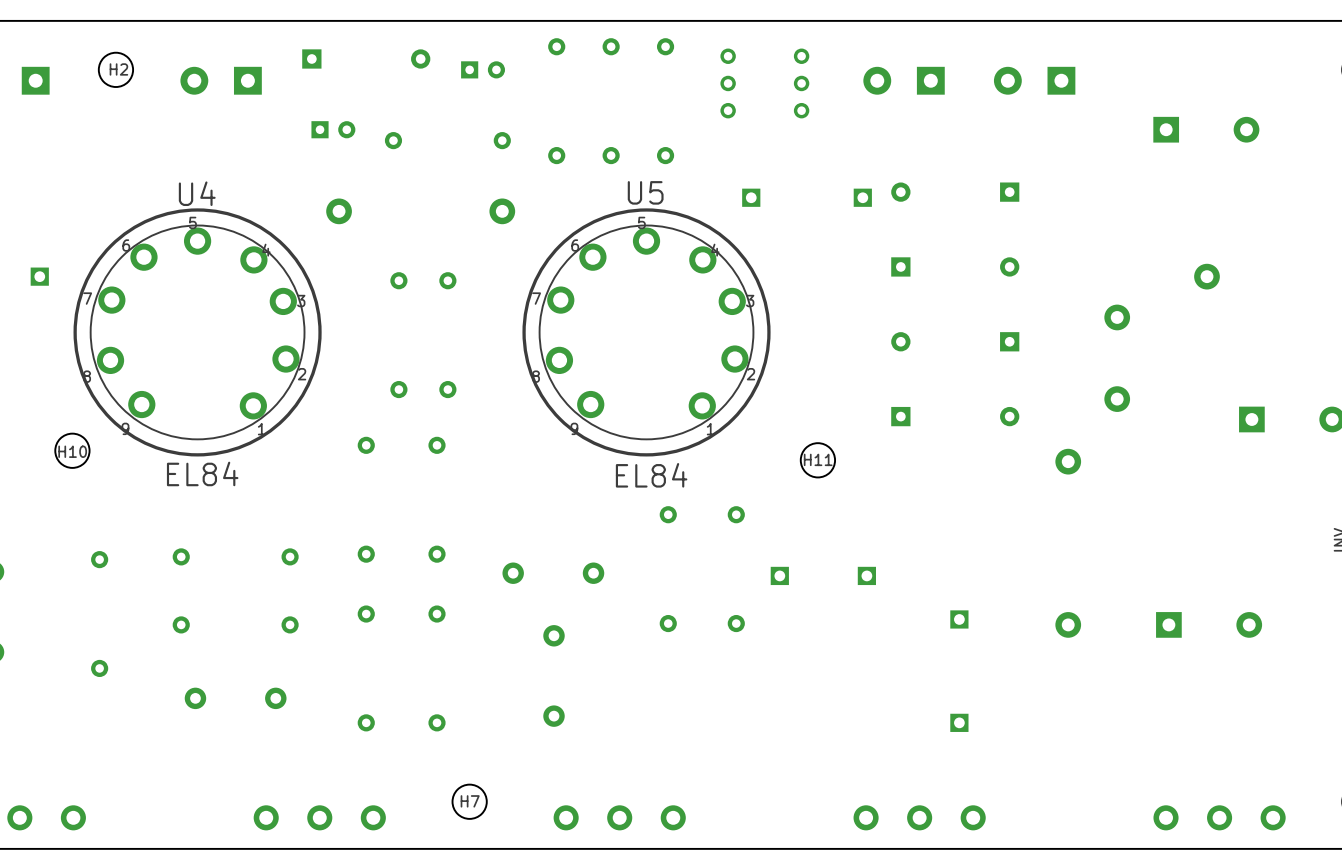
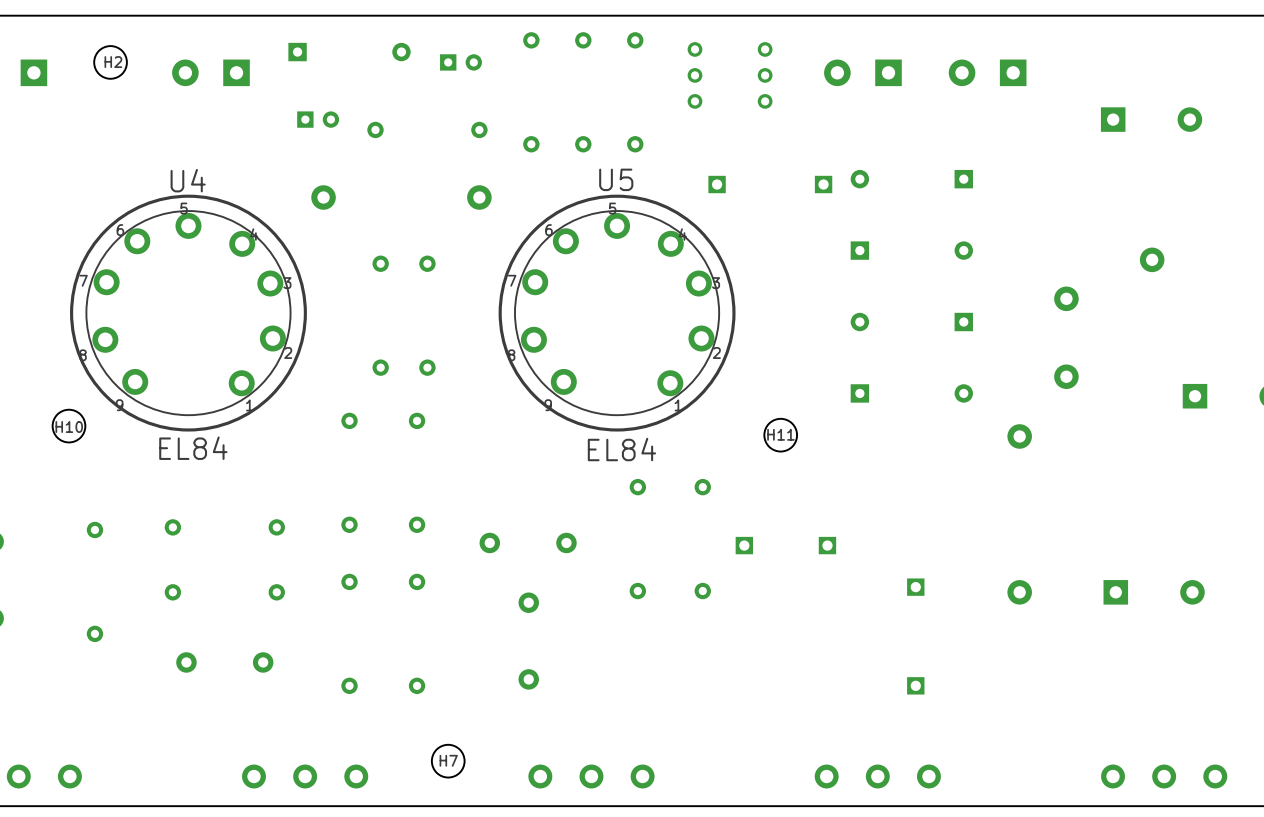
part: (39, 276) -> none

